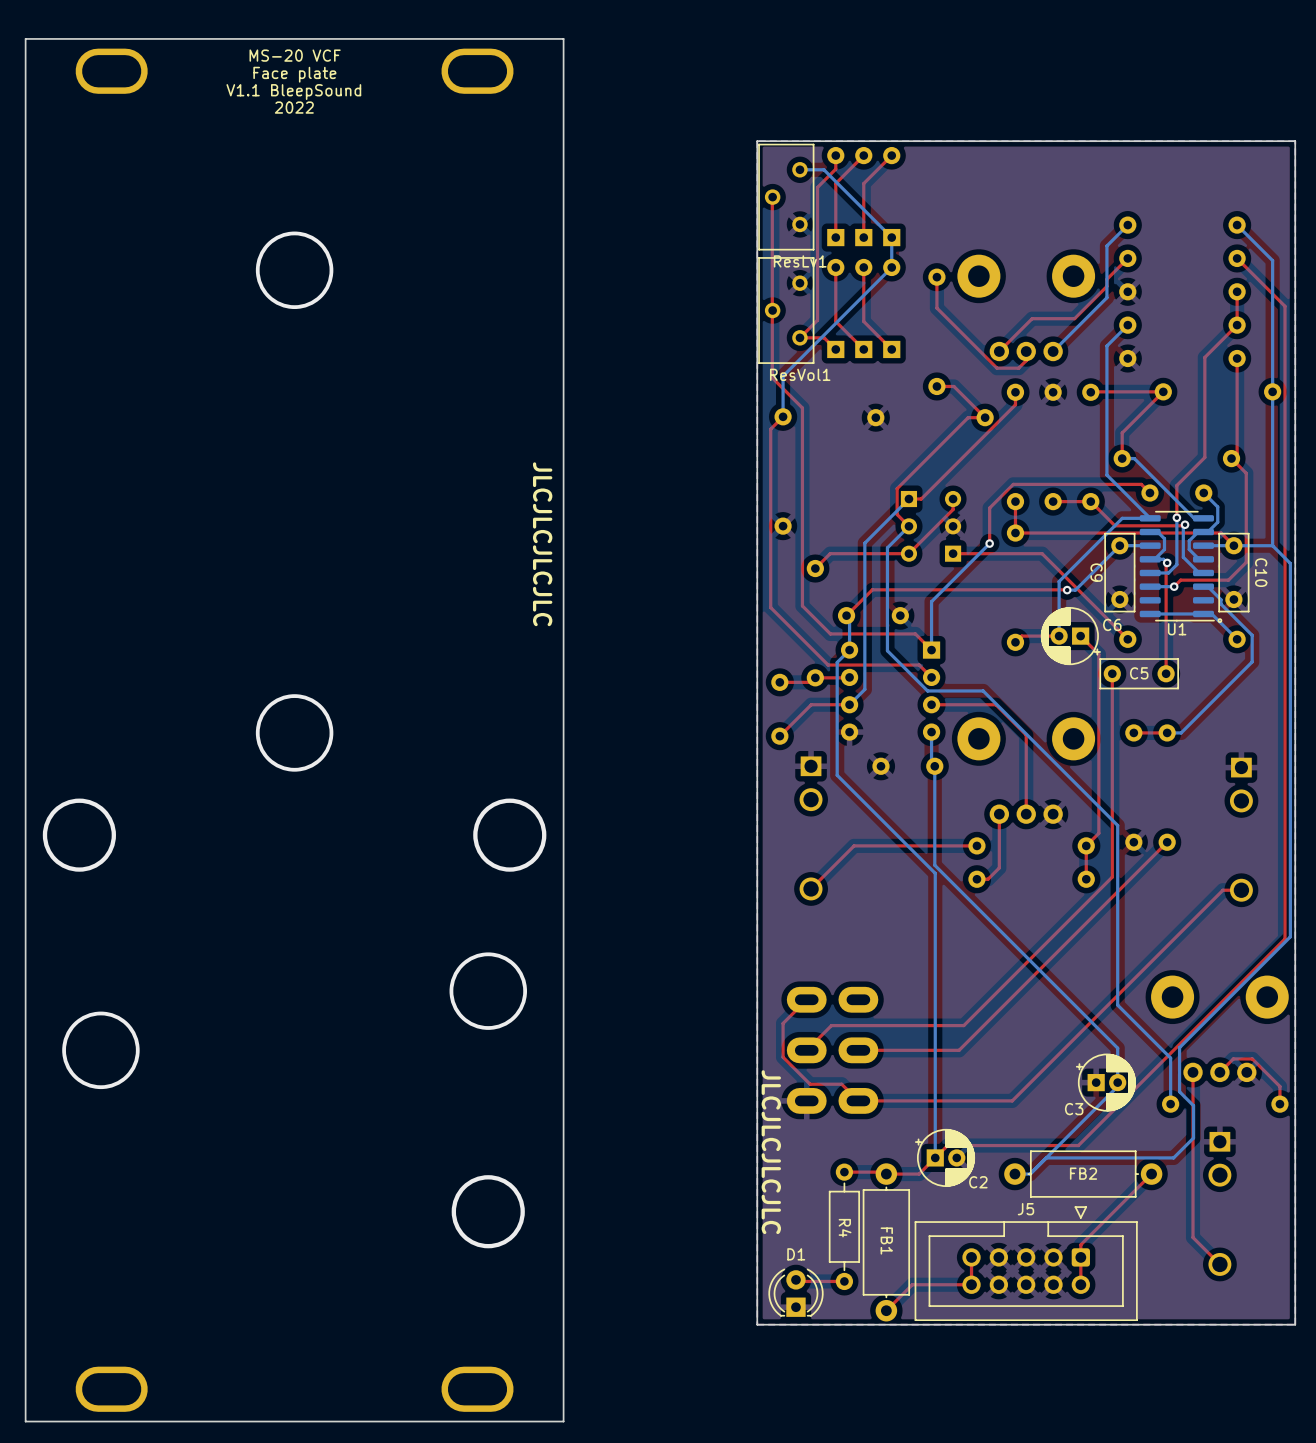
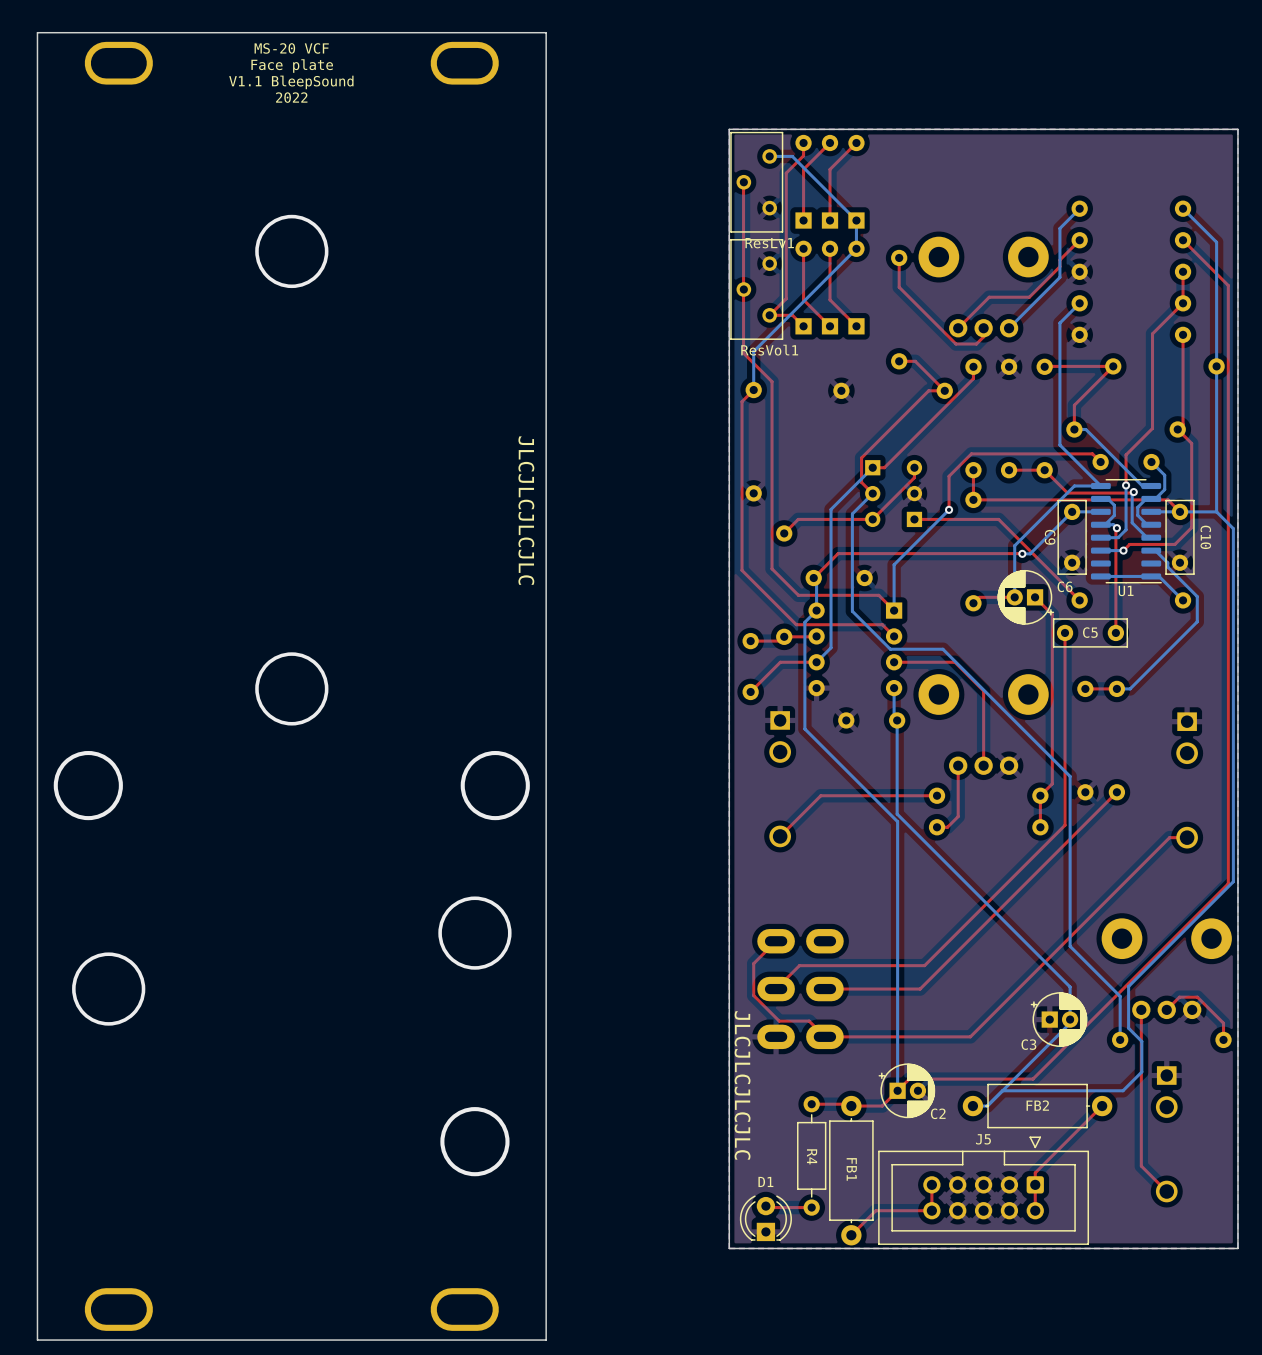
drawing: [1217, 618, 1223, 623] -> none

